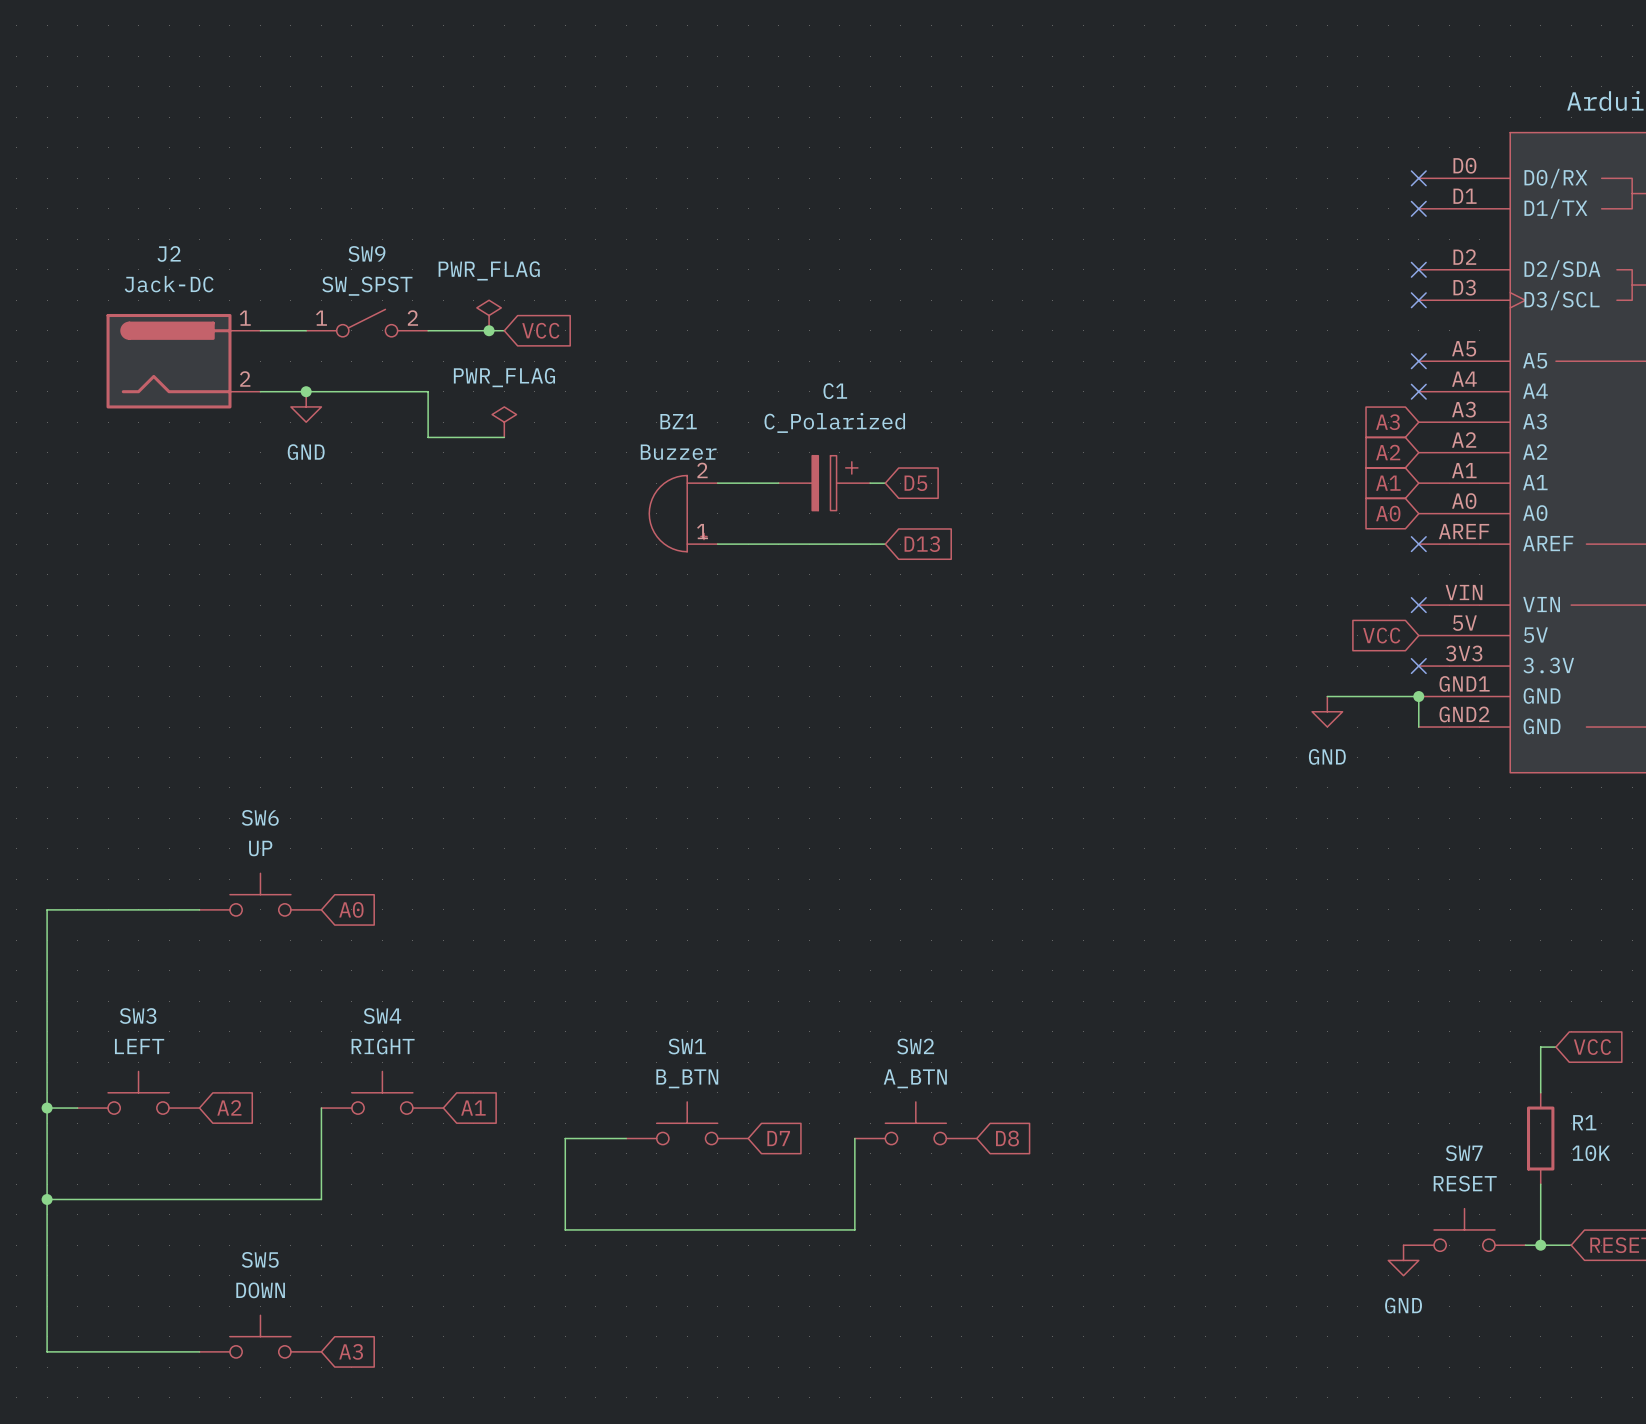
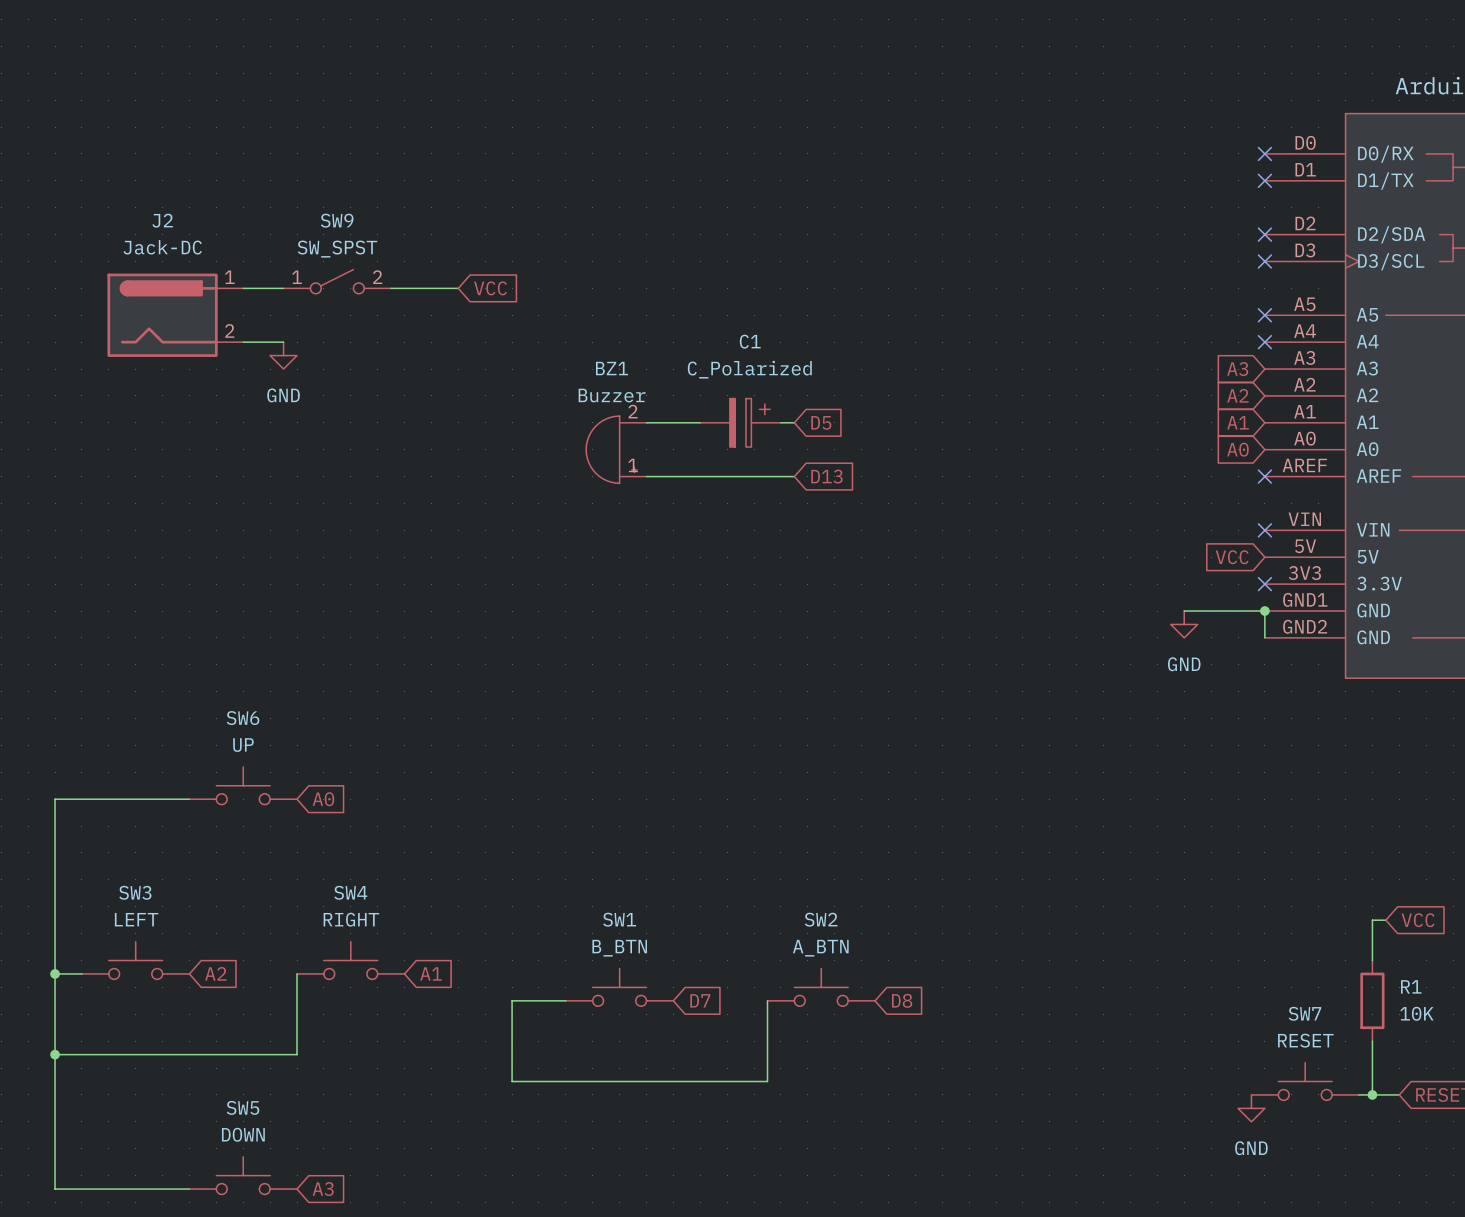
power symbol: PWR_FLAG (489, 315) -> none
junction: (489, 330) -> none
wire: (306, 391) (428, 391) (428, 437) (504, 437) -> none
junction: (306, 391) -> none
power symbol: PWR_FLAG (504, 422) -> none

